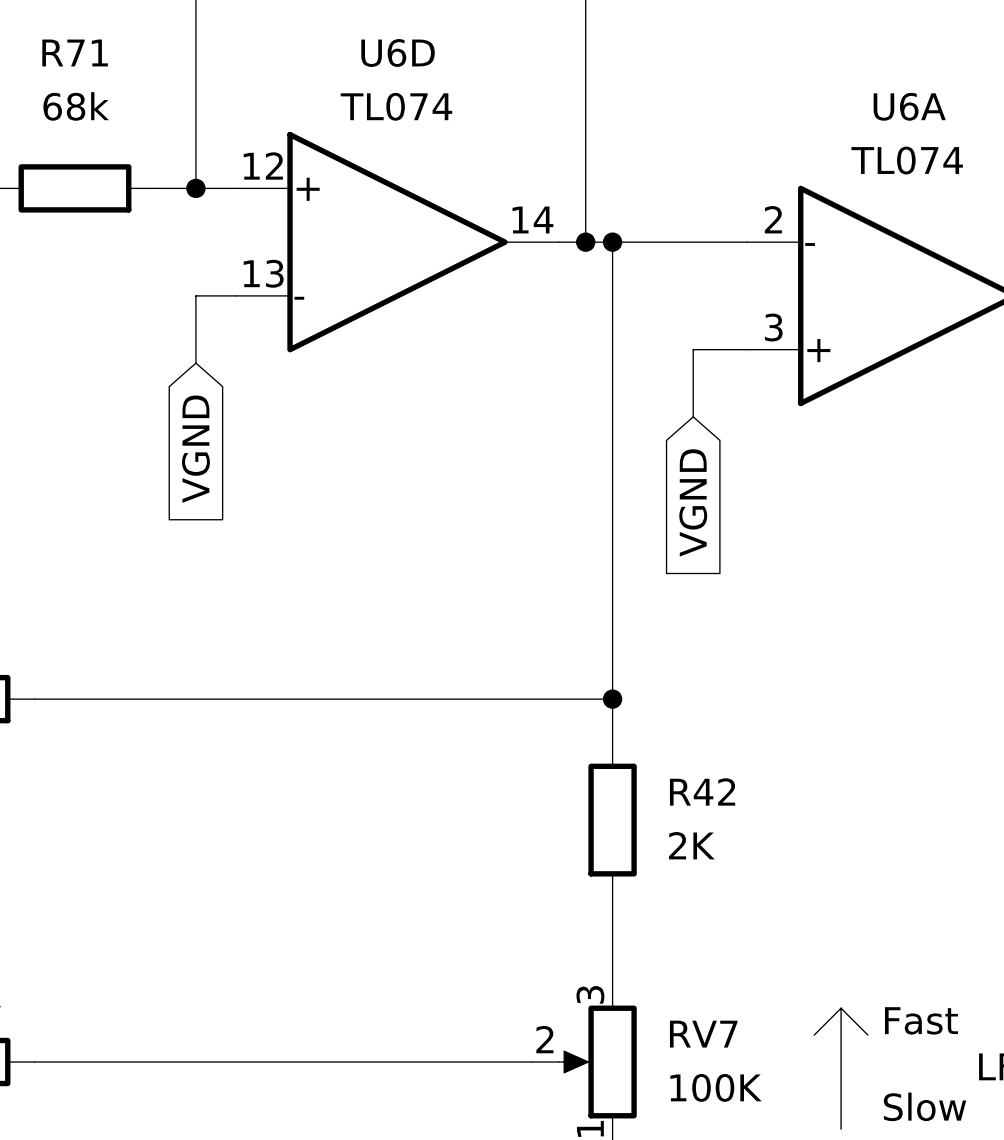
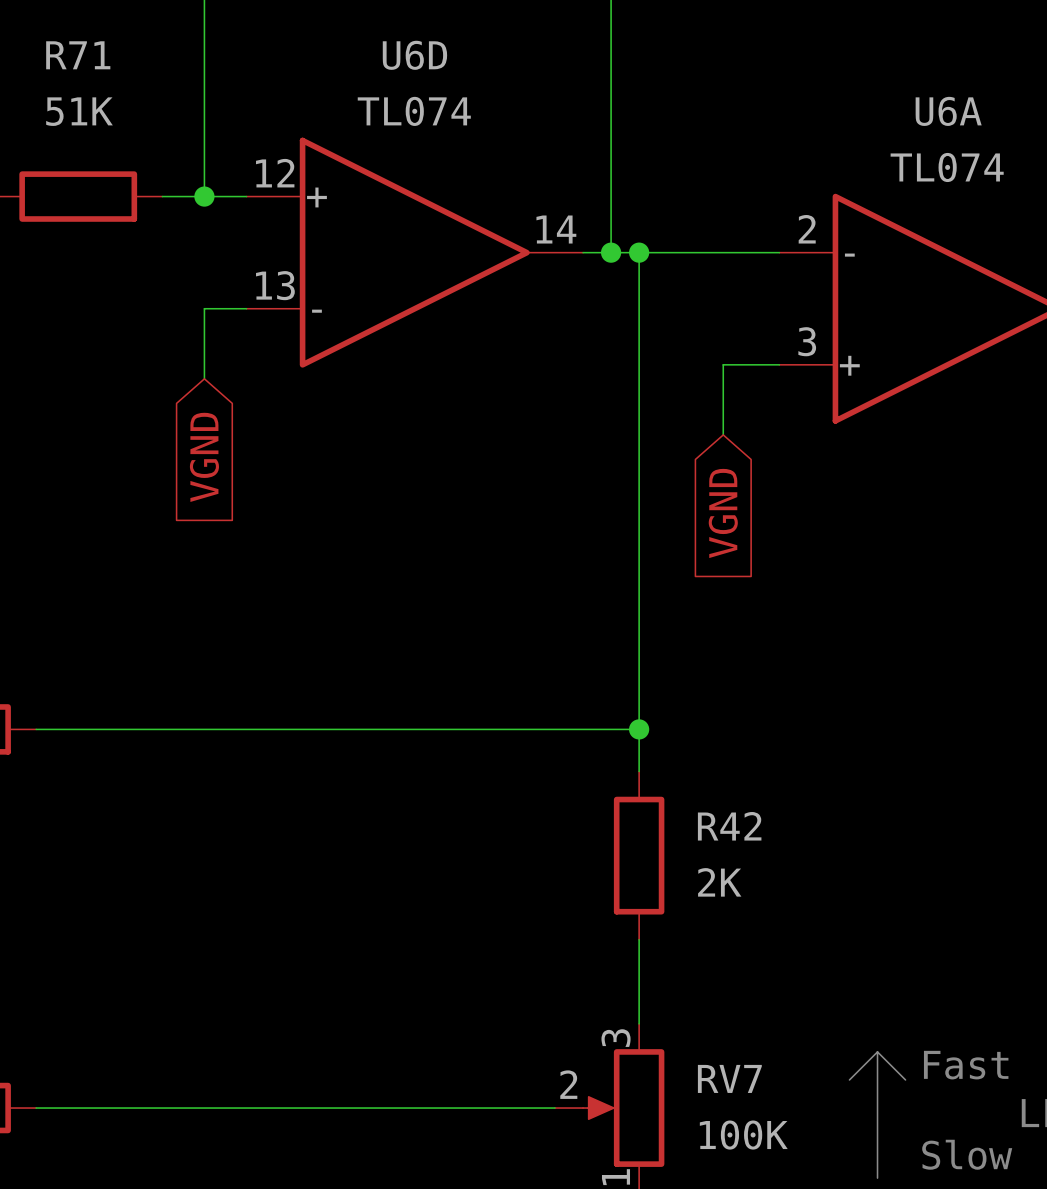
R71 value: 68k (76, 106) -> 51K (79, 111)

